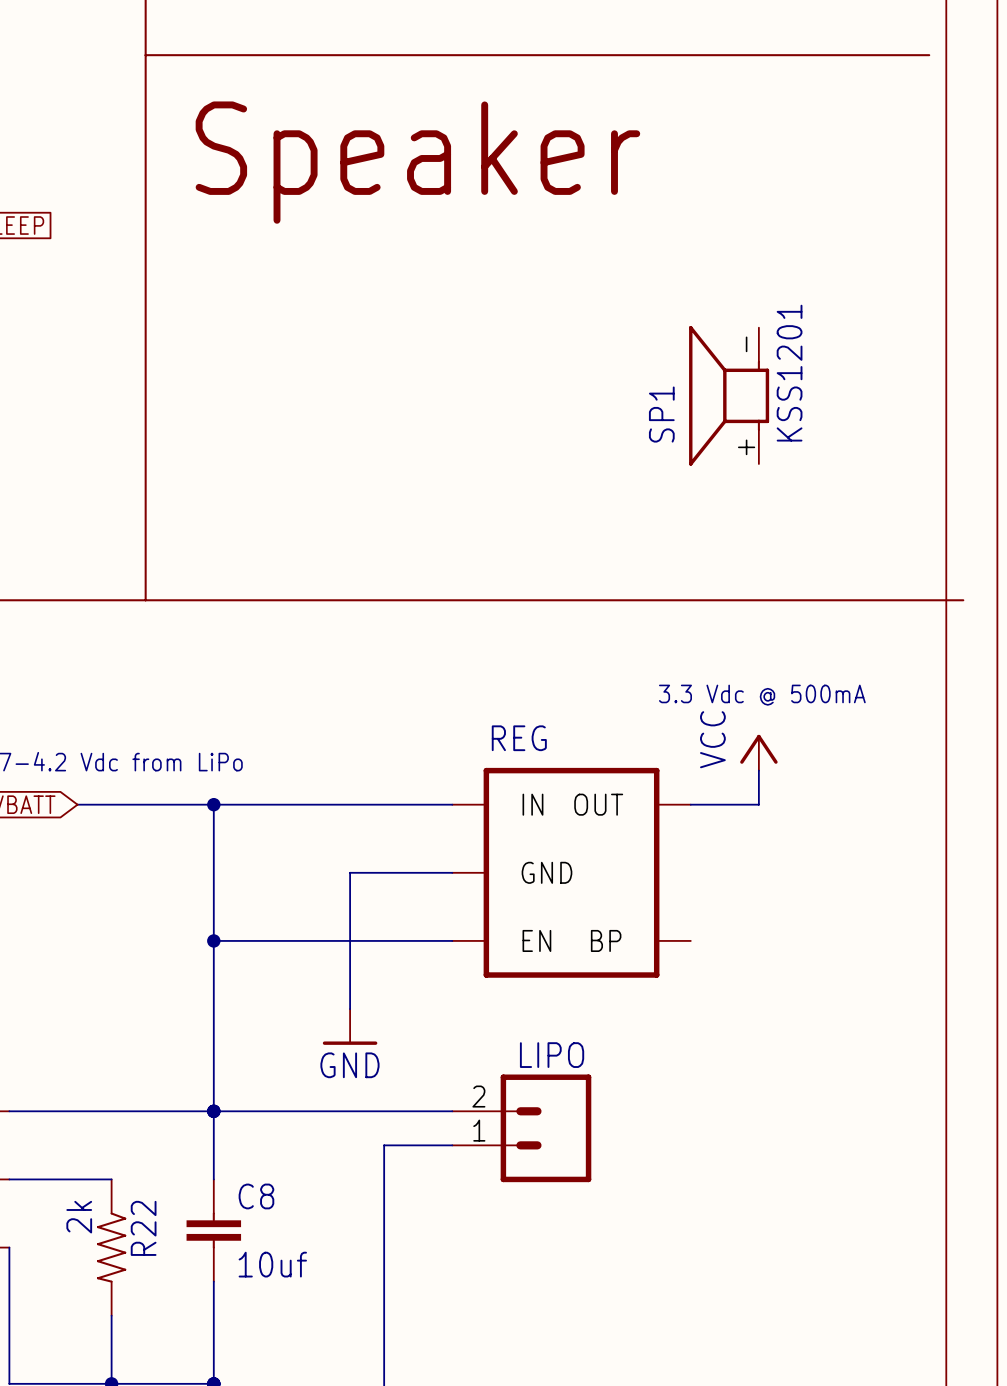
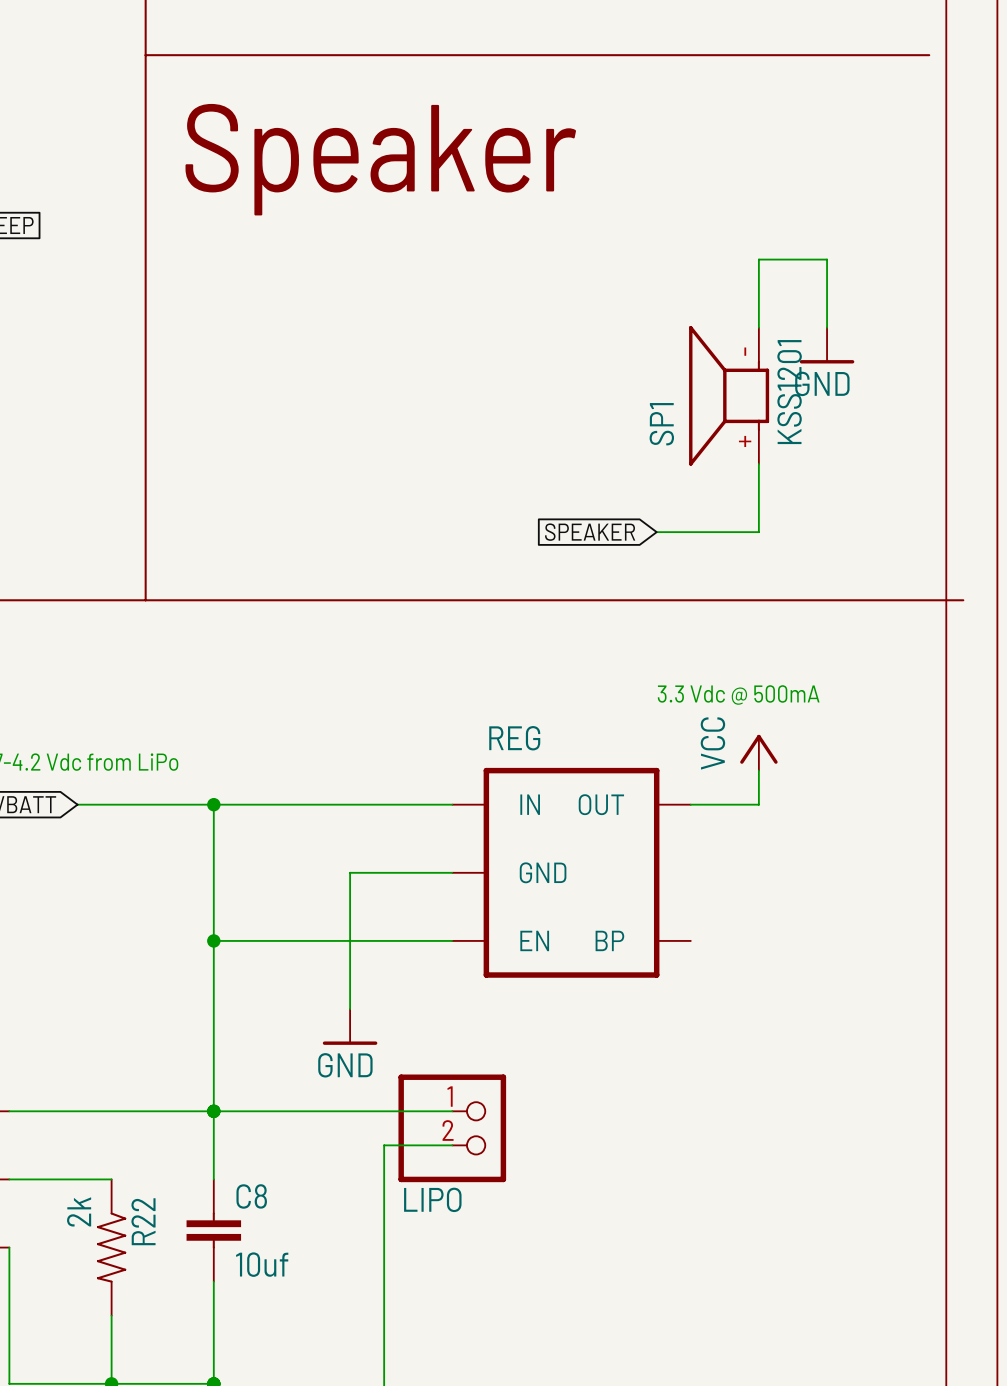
wire: none -> (758, 327) (758, 259) (827, 259) (827, 327)
power symbol: none -> GND (827, 345)
wire: none -> (758, 463) (758, 532) (656, 532)
global label: none -> SPEAKER (590, 532)
LIPO: none -> (452, 1128)
LIPO: (521, 1128) -> none

